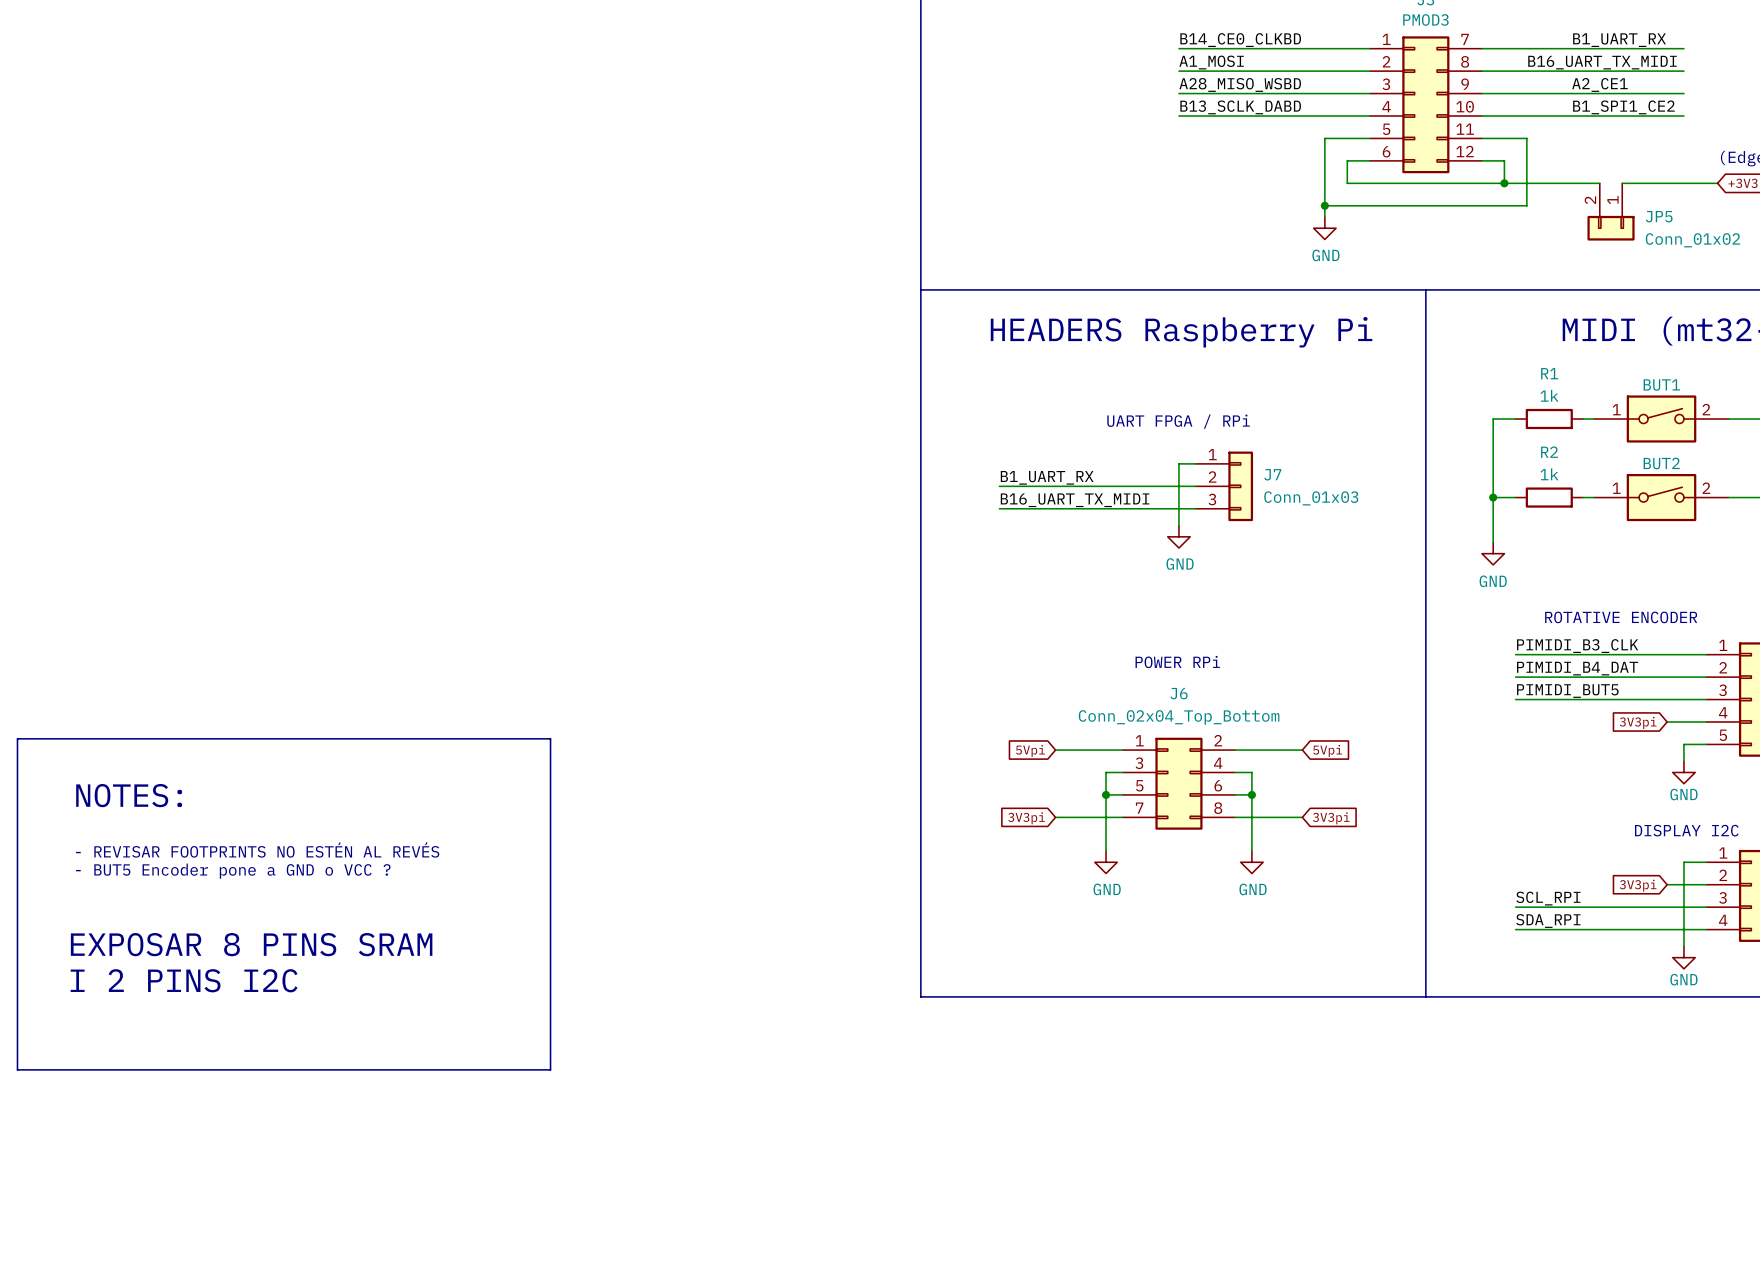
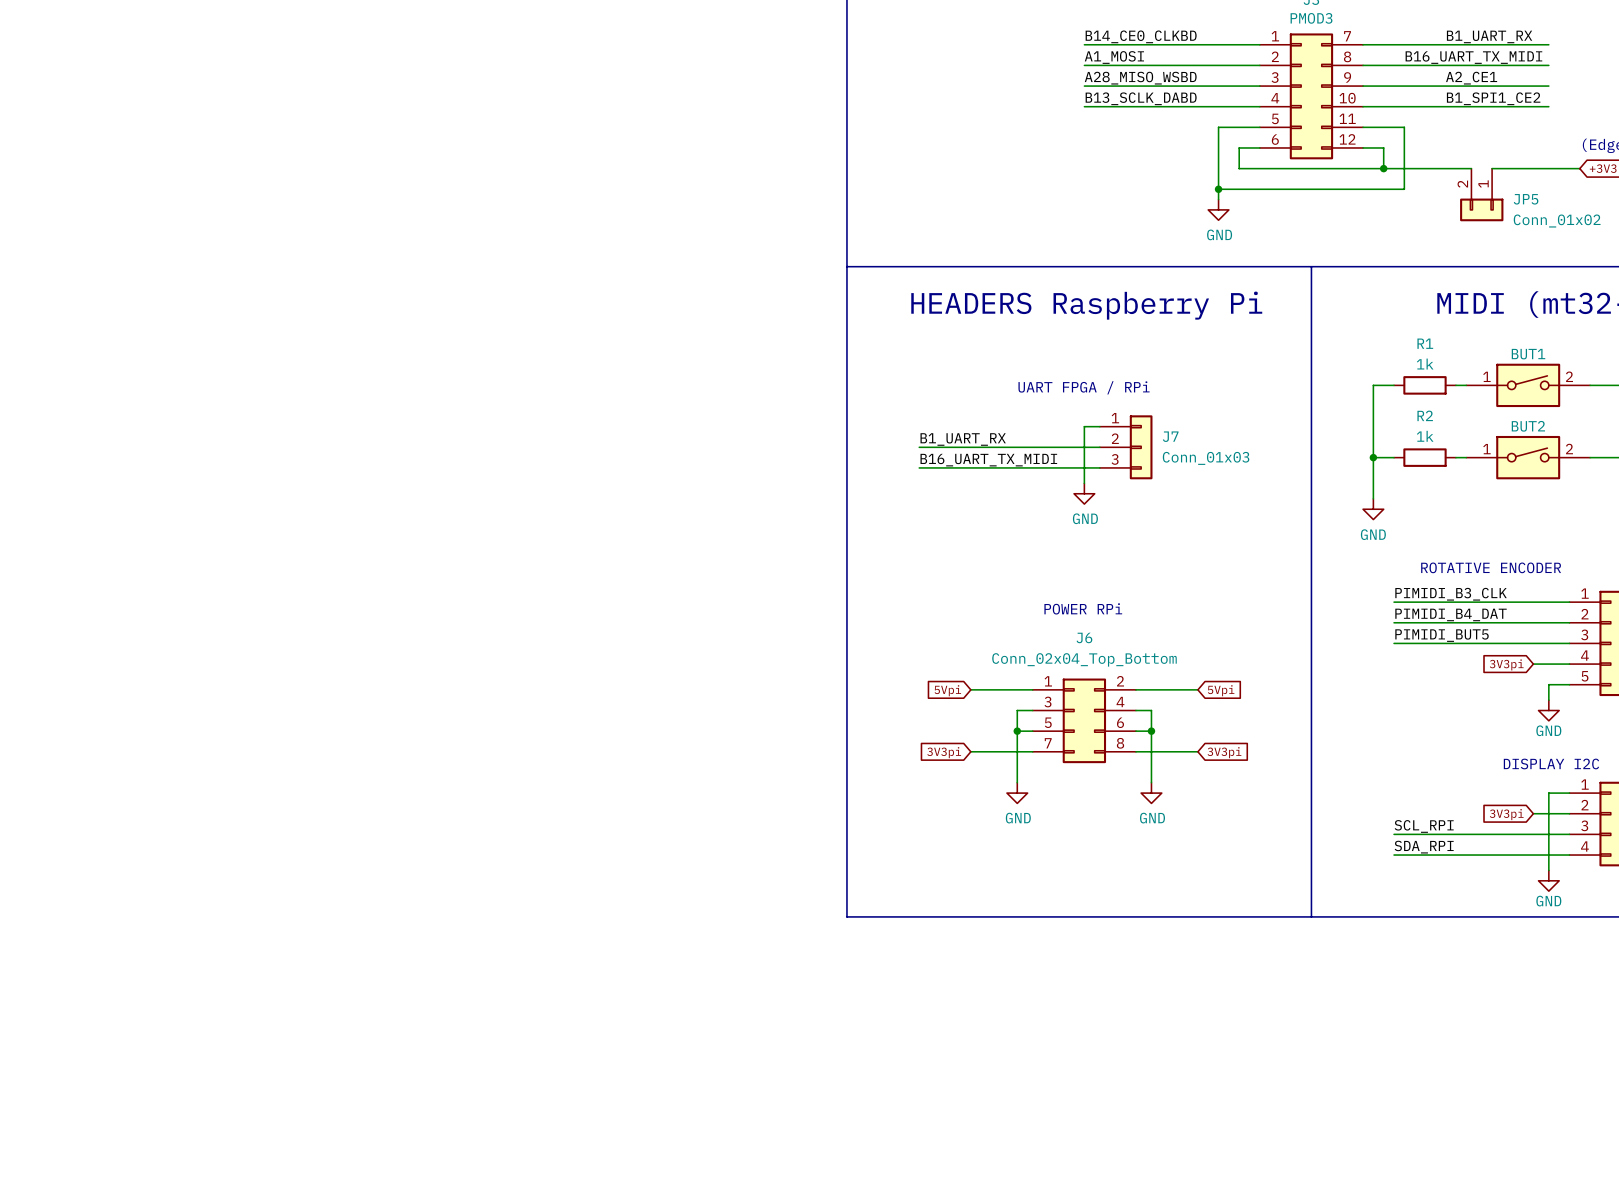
line: (17, 738) (550, 738) (550, 1069) (17, 1069) (17, 738) -> none
text: NOTES: (129, 795) -> none
text: - REVISAR FOOTPRINTS NO ESTÉN AL REVÉS (257, 849) -> none
text: - BUT5 Encoder pone a GND o VCC ? (233, 871) -> none
text: EXPOSAR 8 PINS SRAM (251, 944) -> none
text: I 2 PINS I2C (184, 980) -> none

